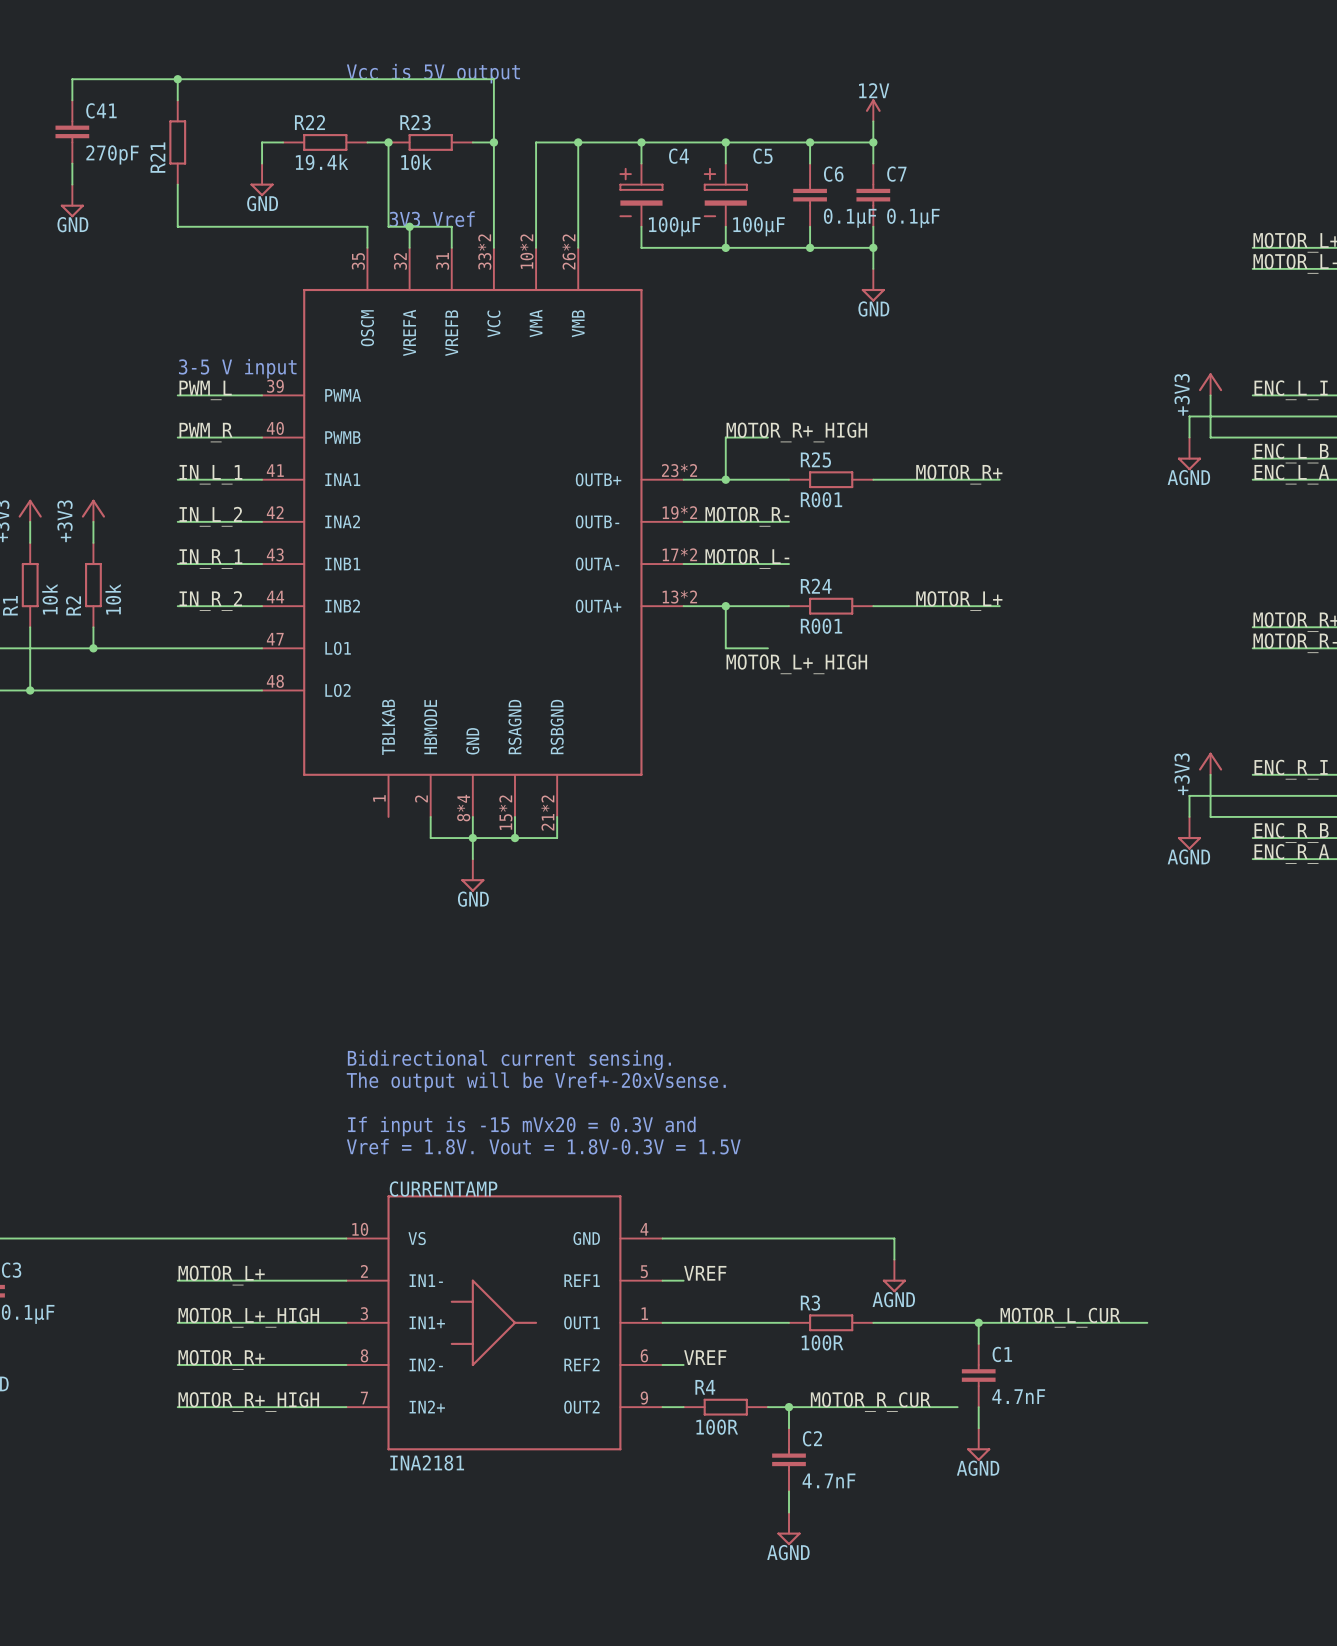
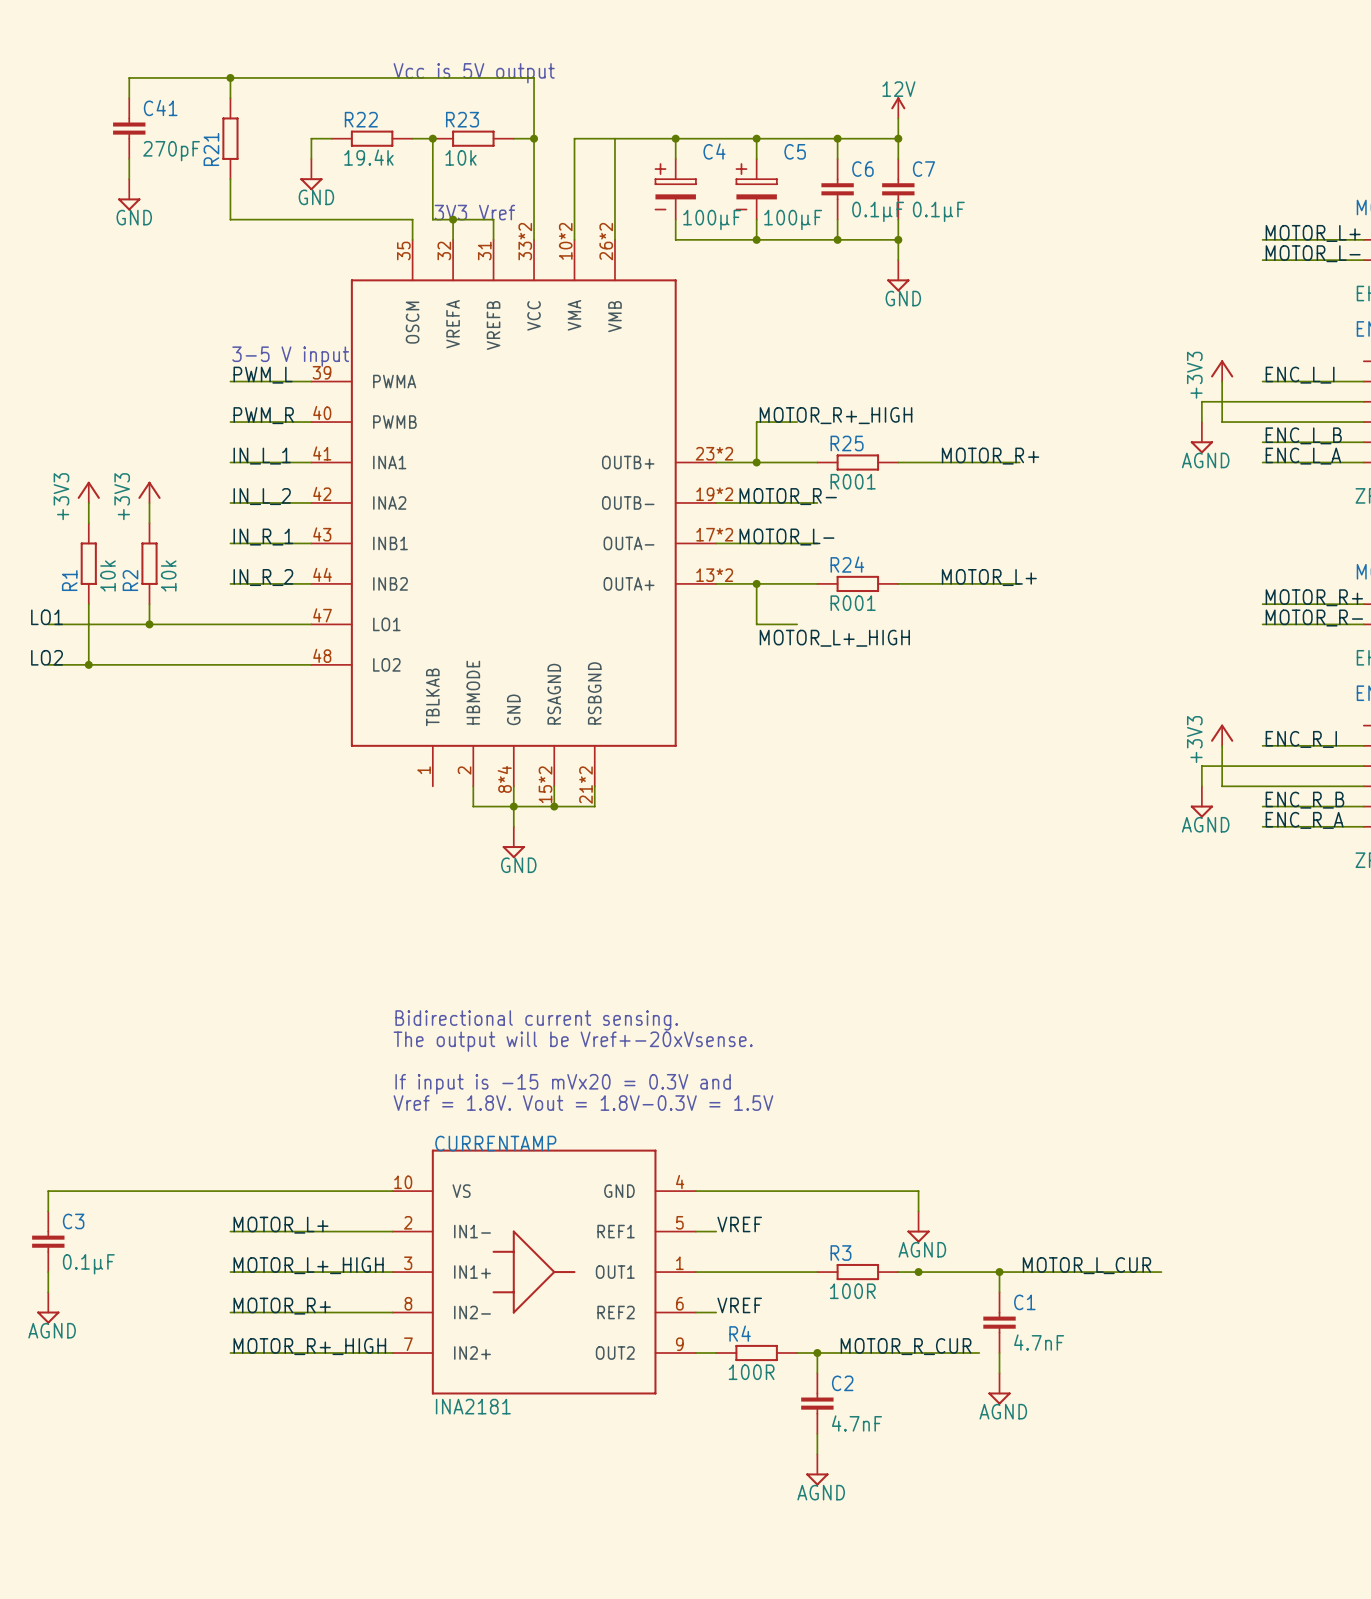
junction: (578, 142) -> none
junction: none -> (918, 1272)

